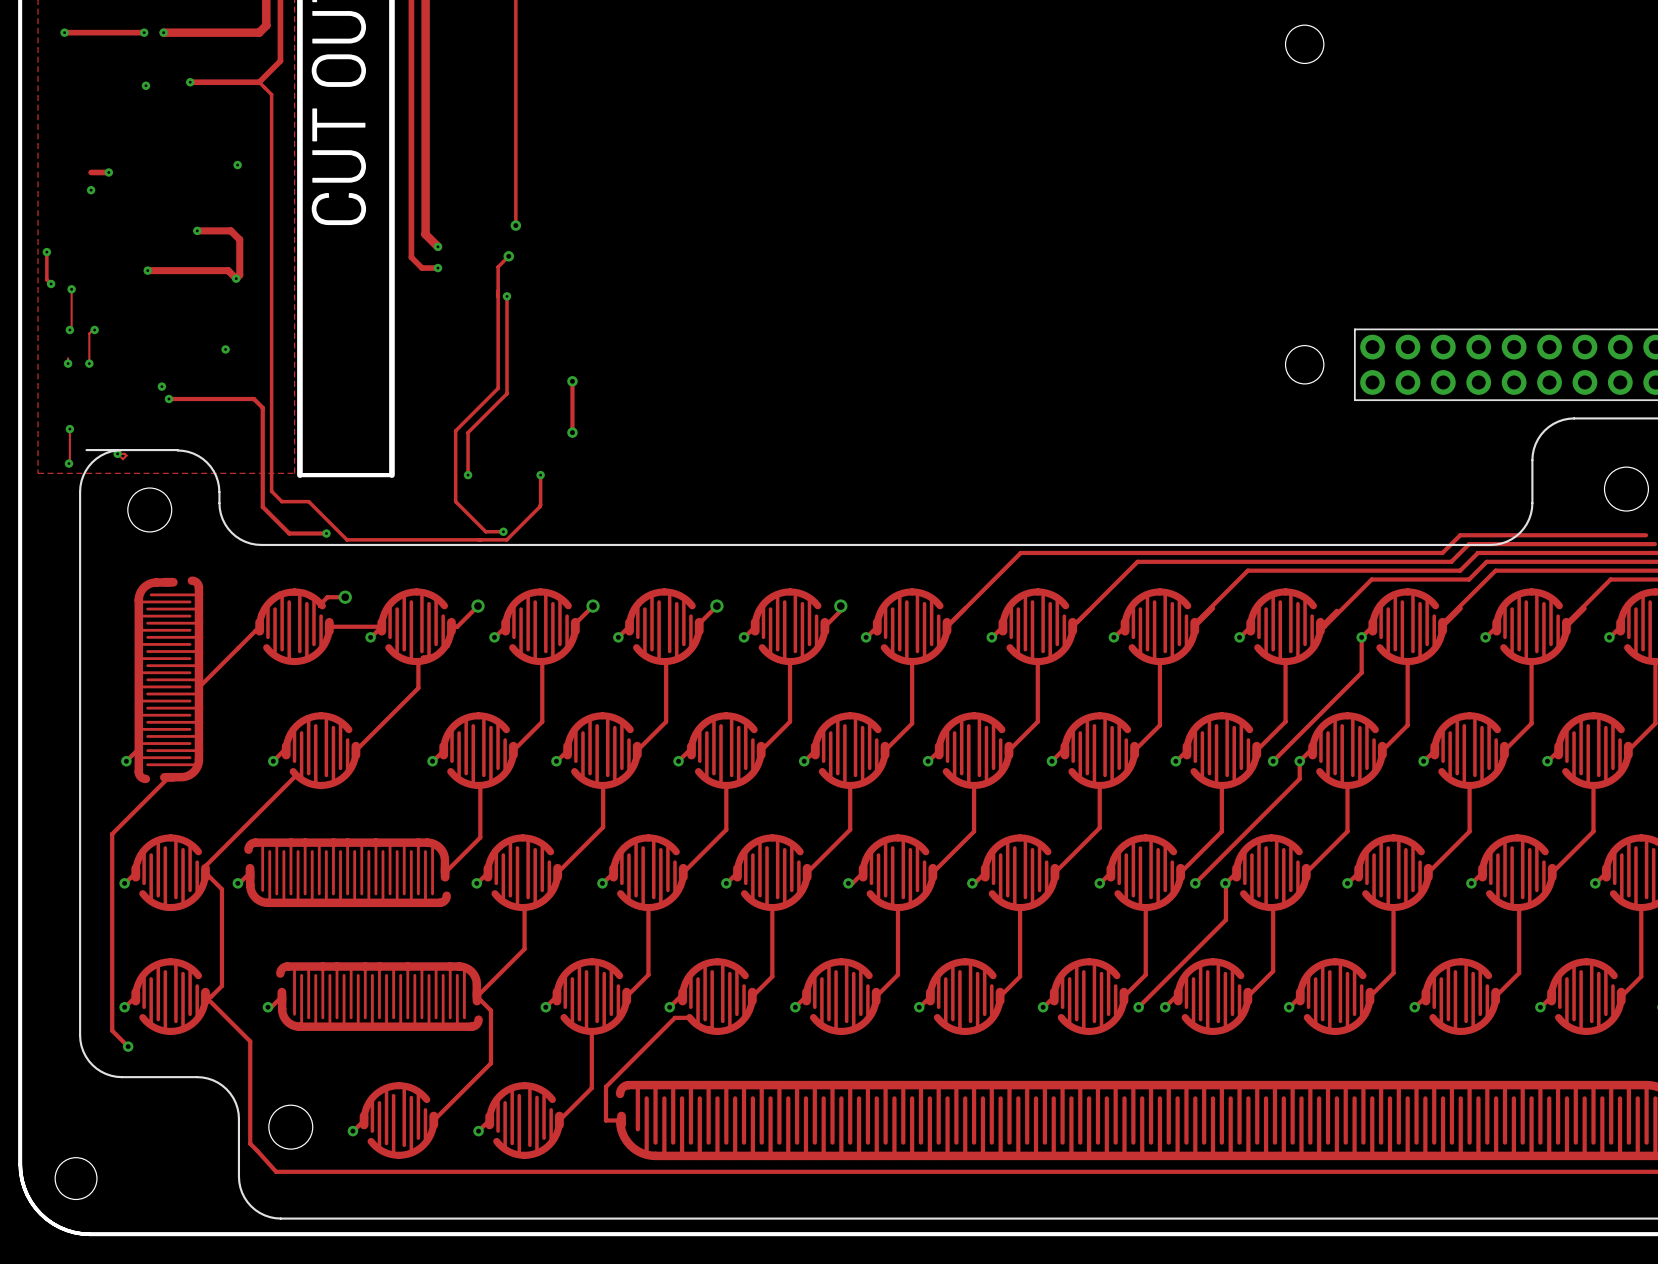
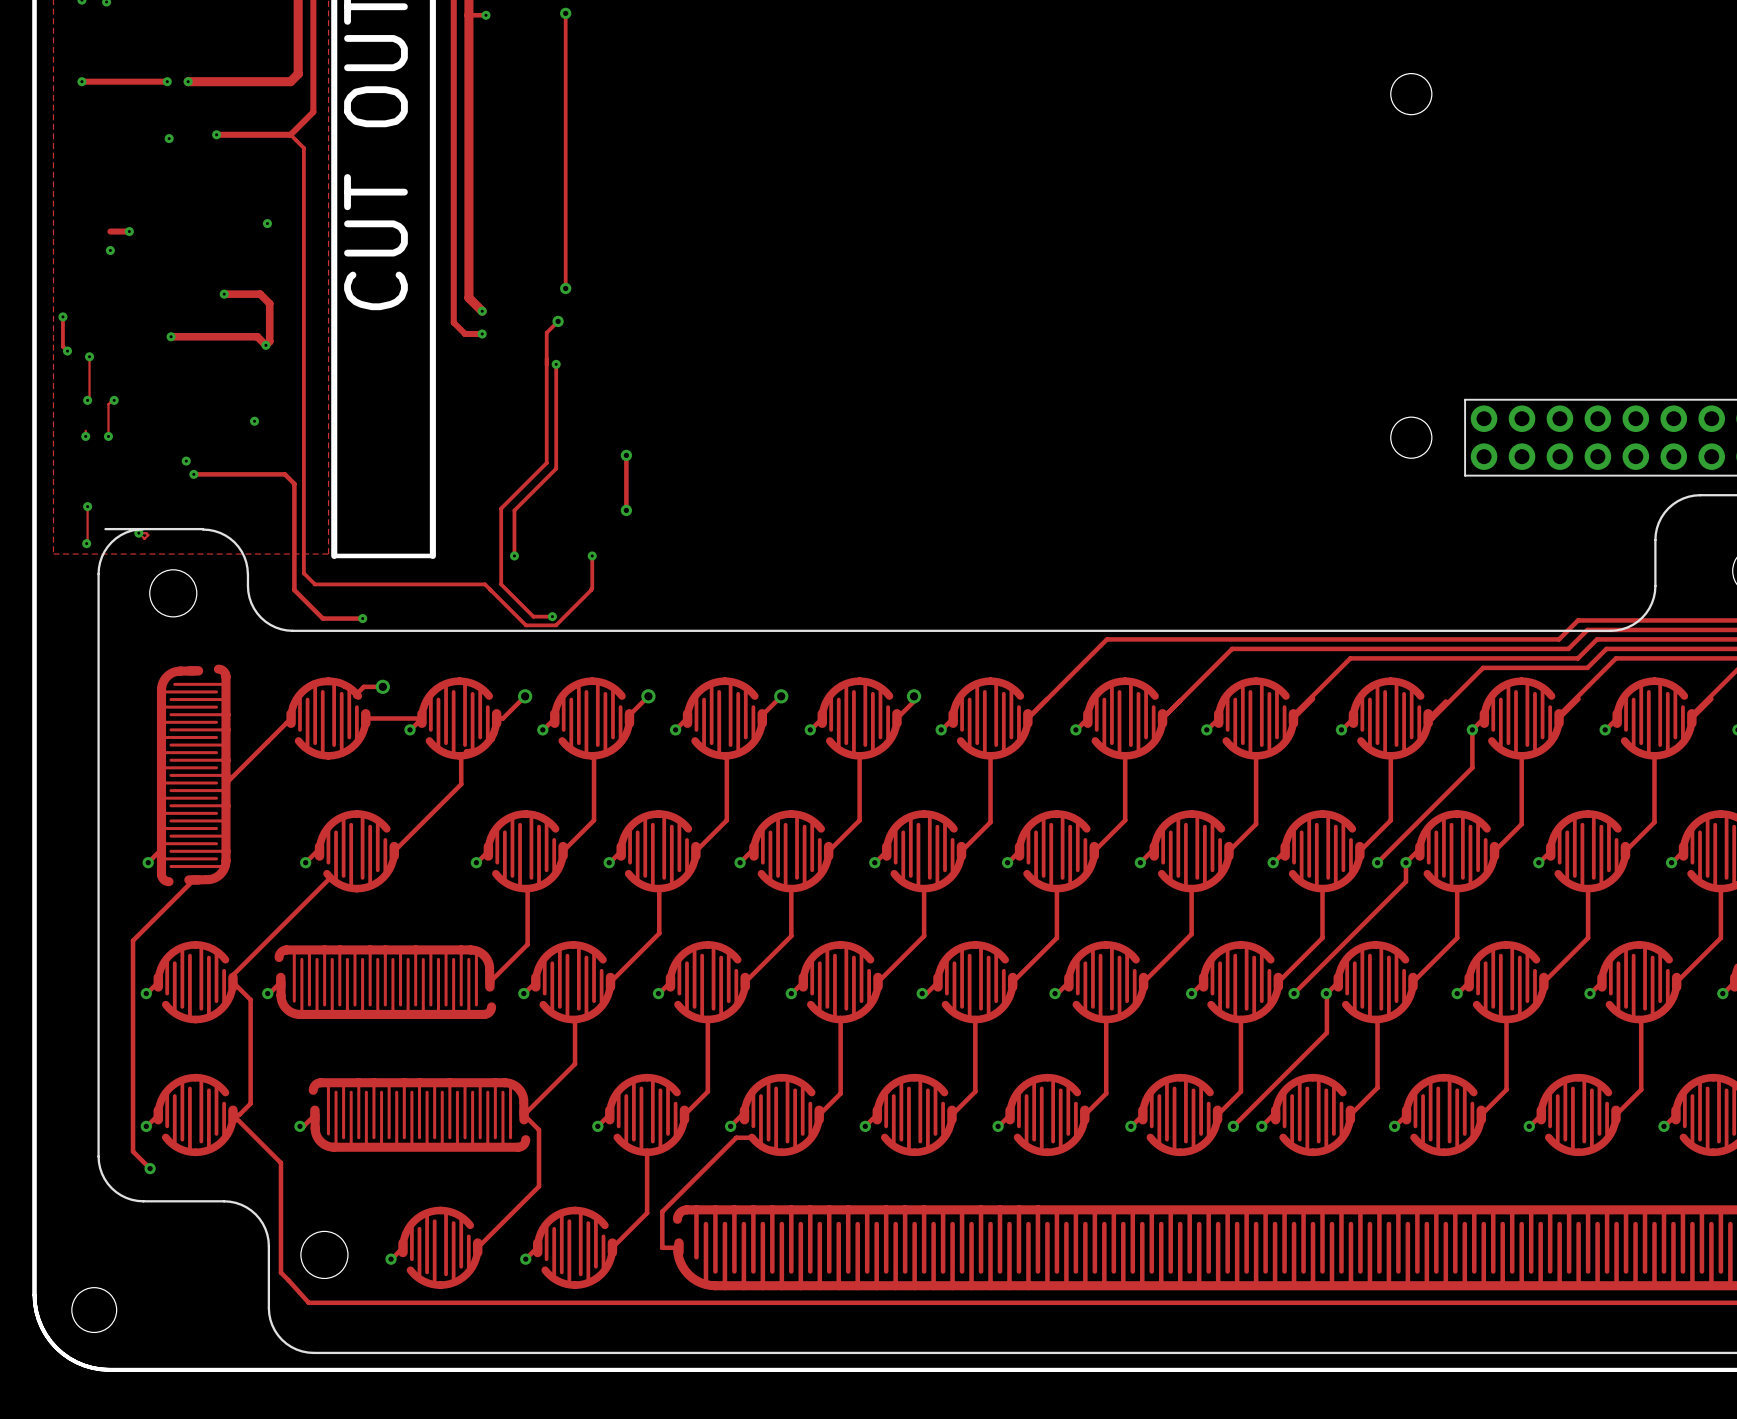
track: (308, 501) (346, 539) (478, 539) -> (343, 584) (485, 584) (525, 625)

